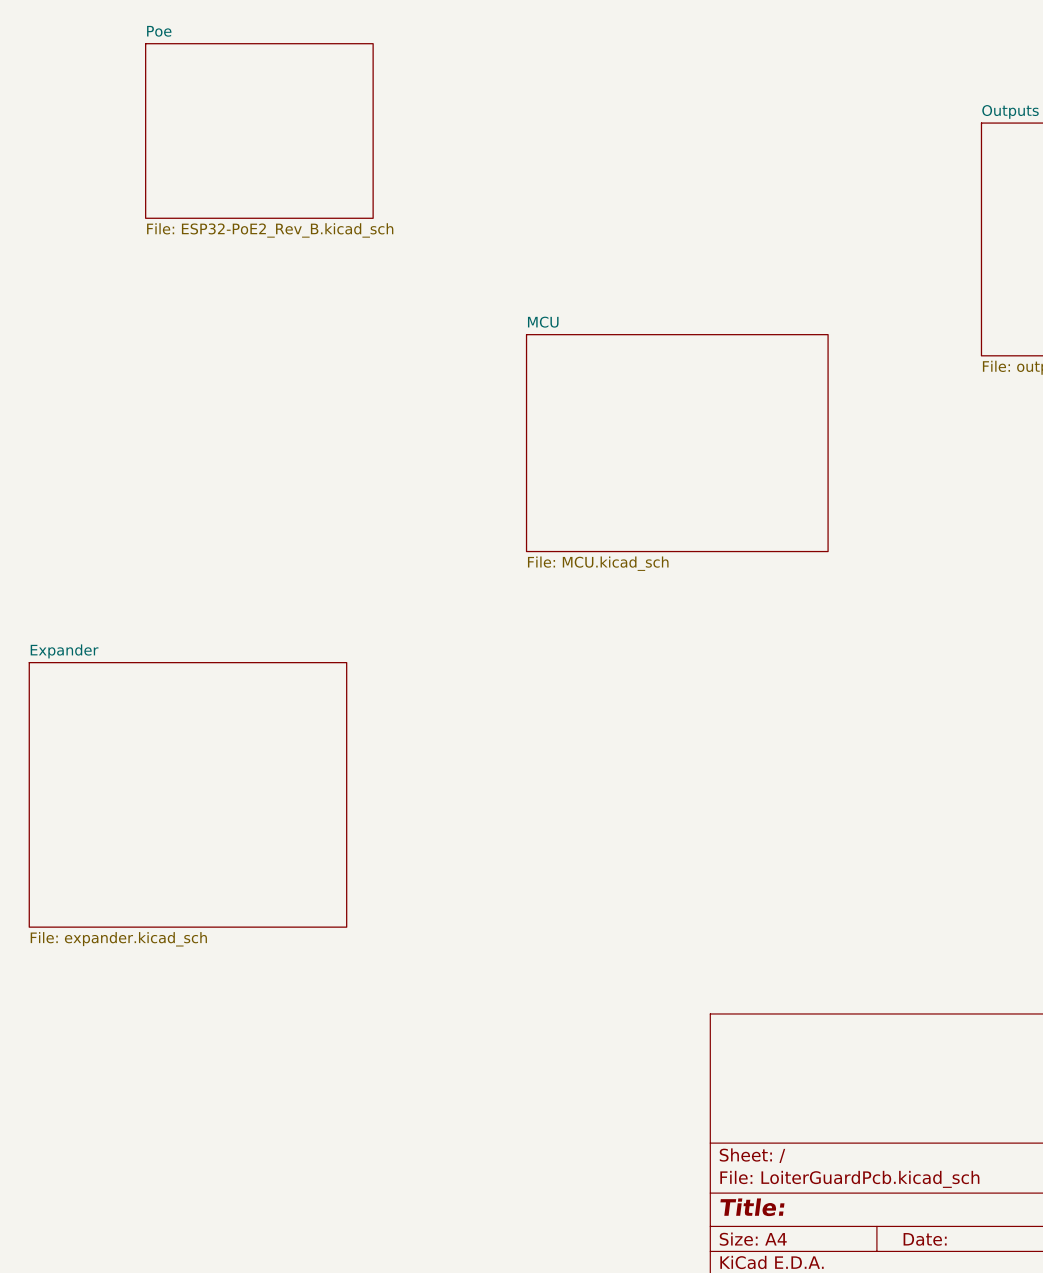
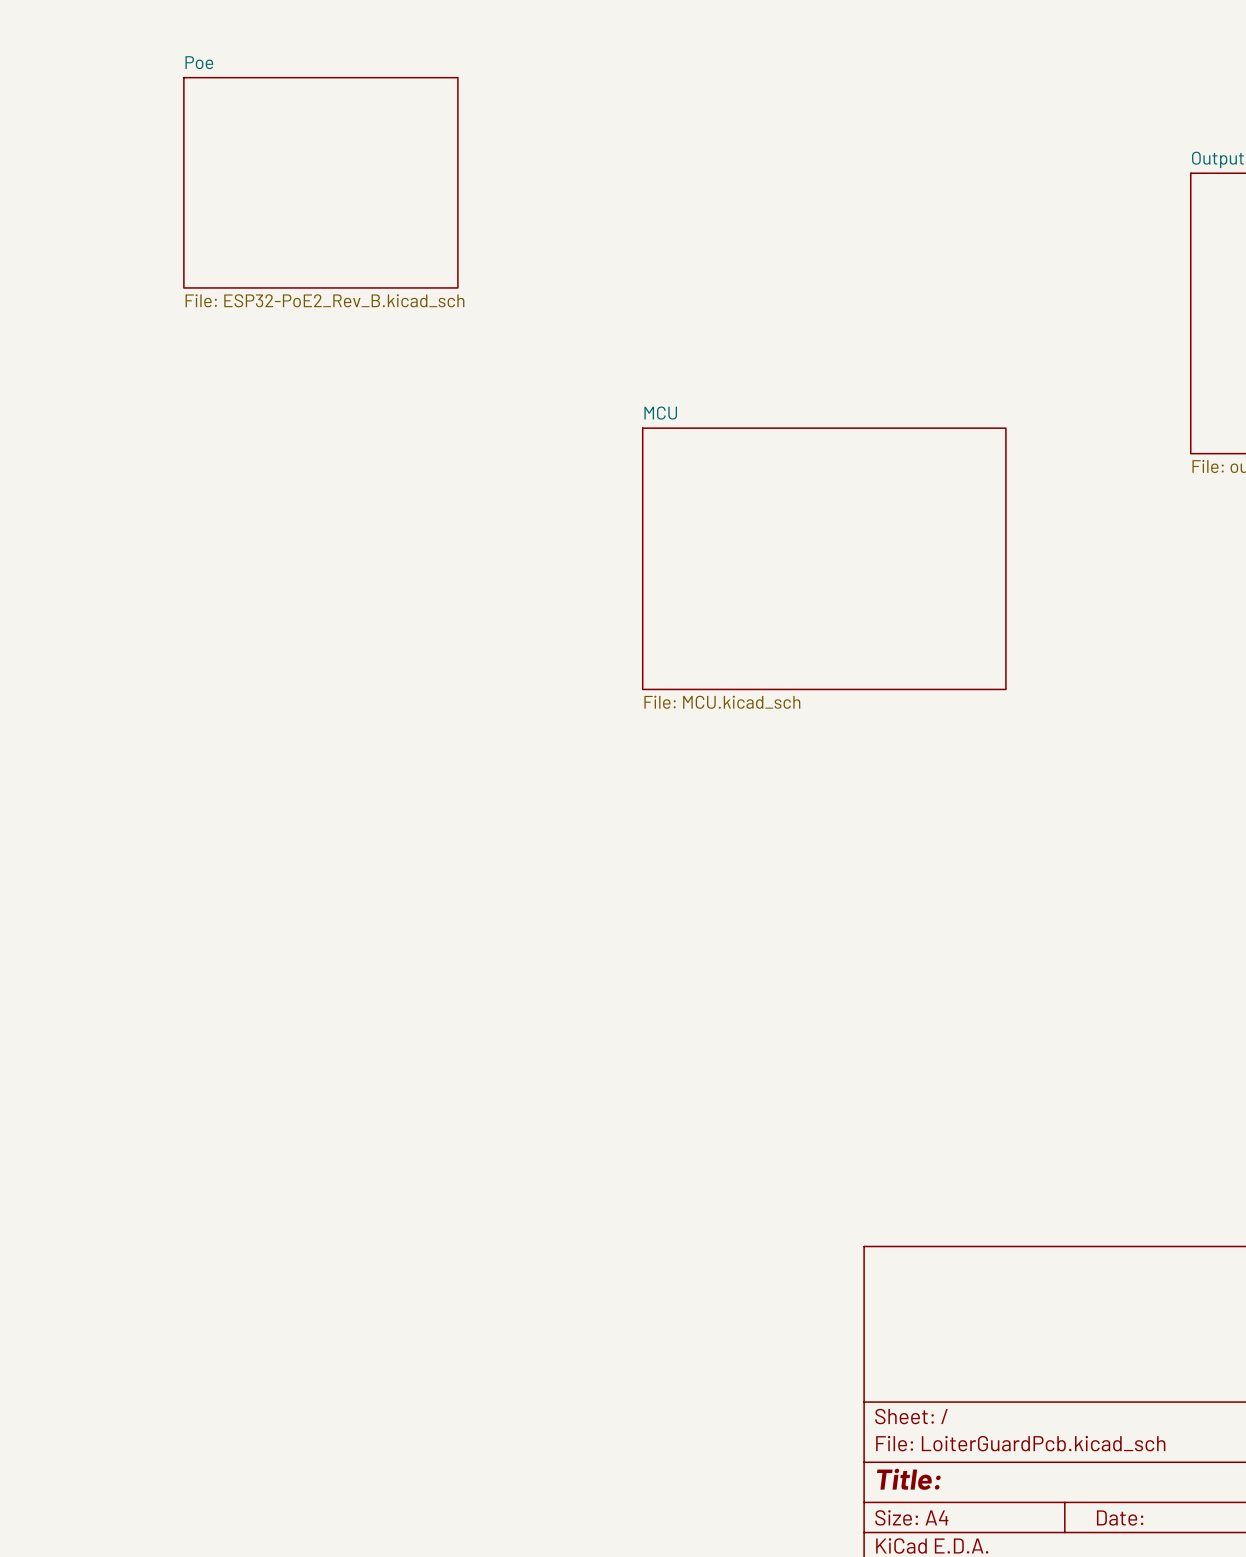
sheet Expander: File: expander.kicad_sch (187, 794) -> none

